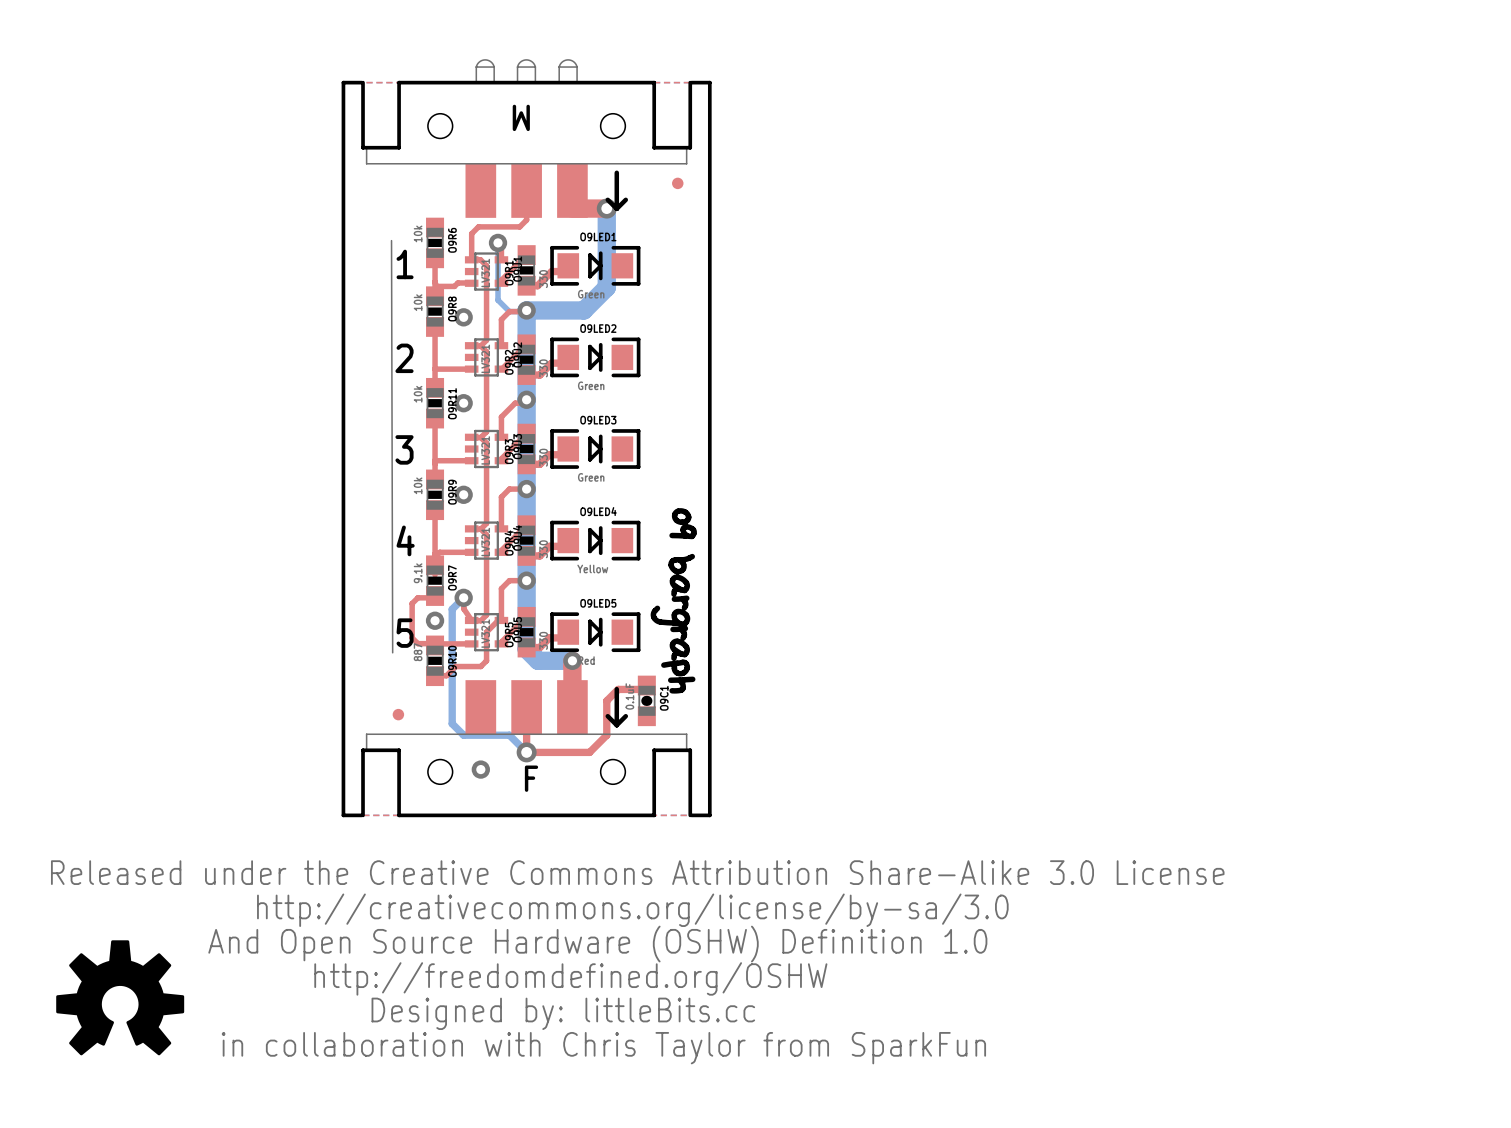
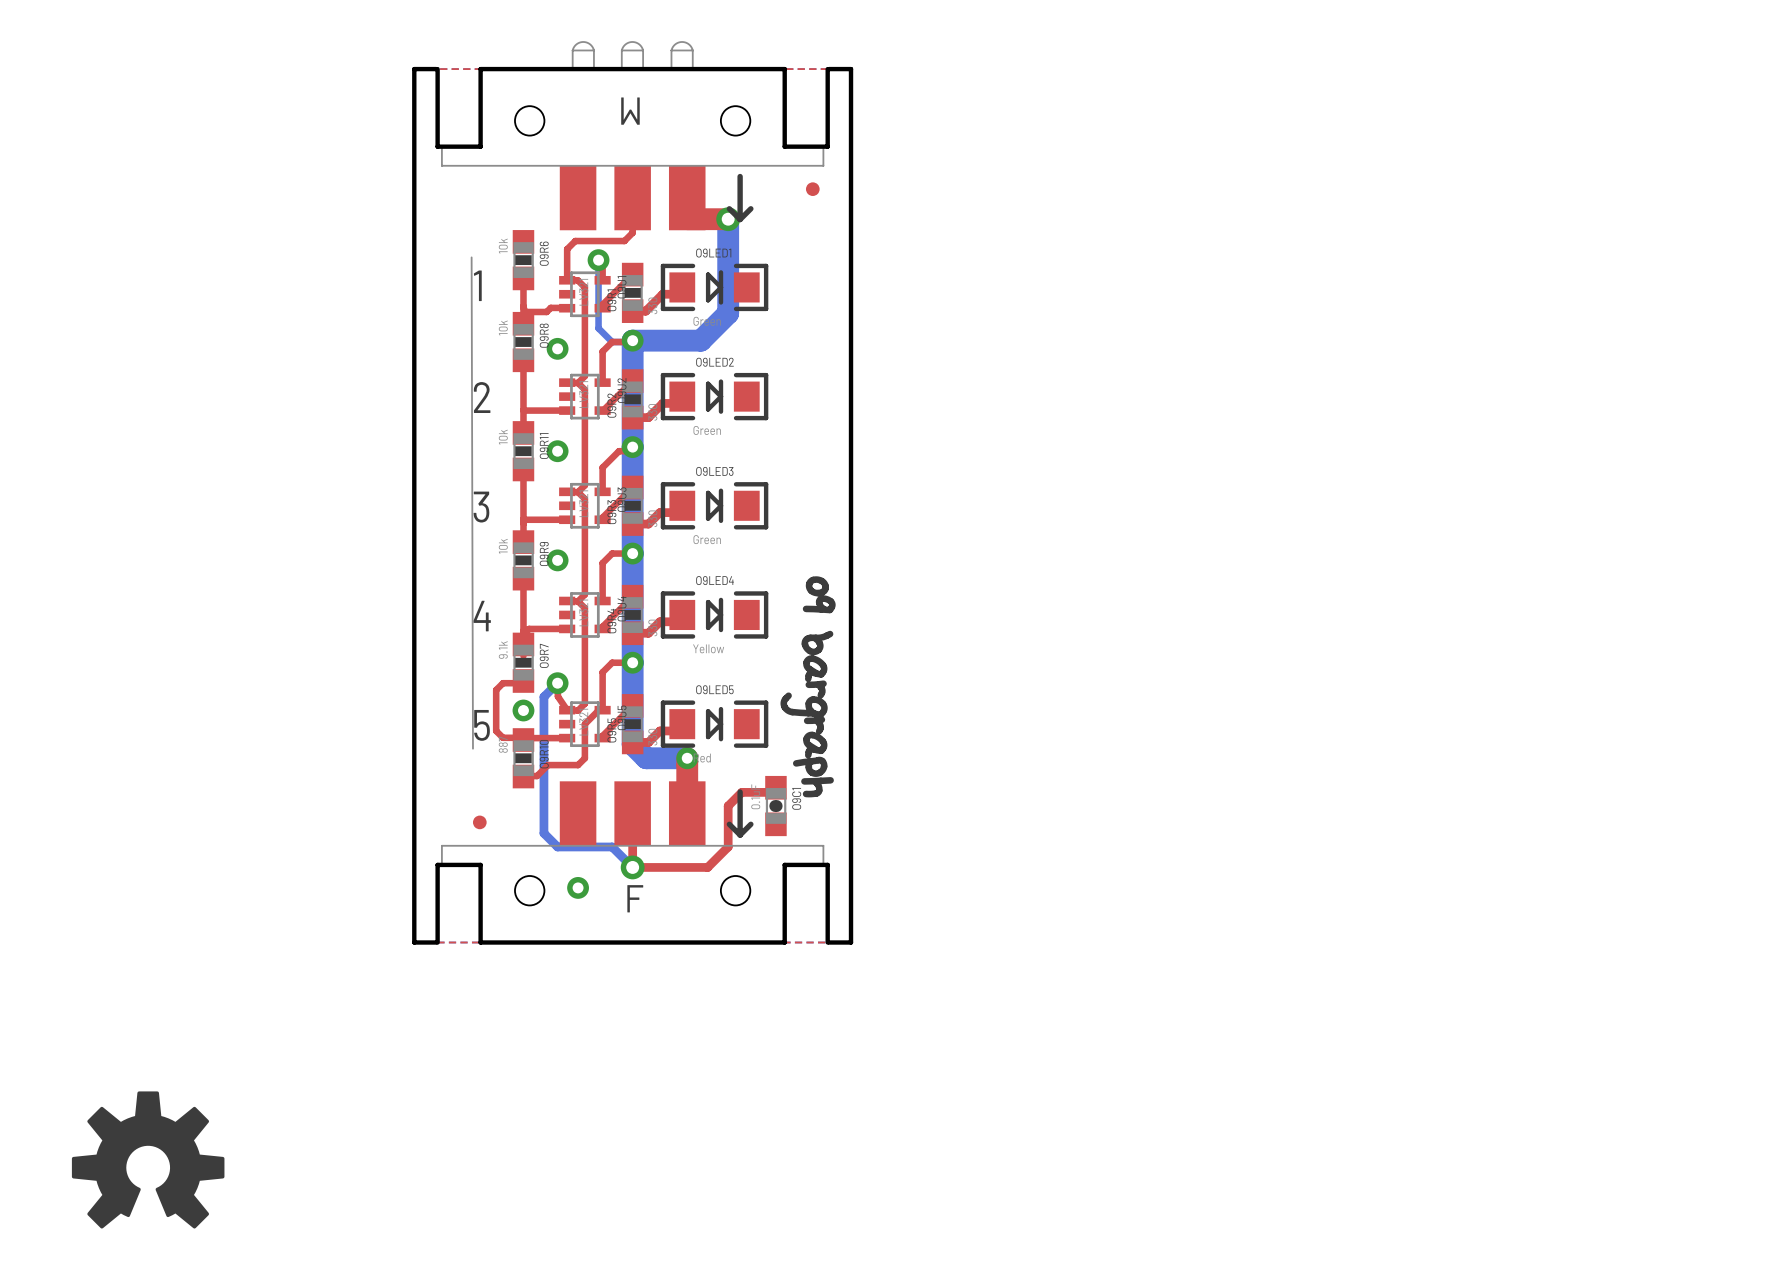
drawing: [50, 860, 1225, 1065] -> none

